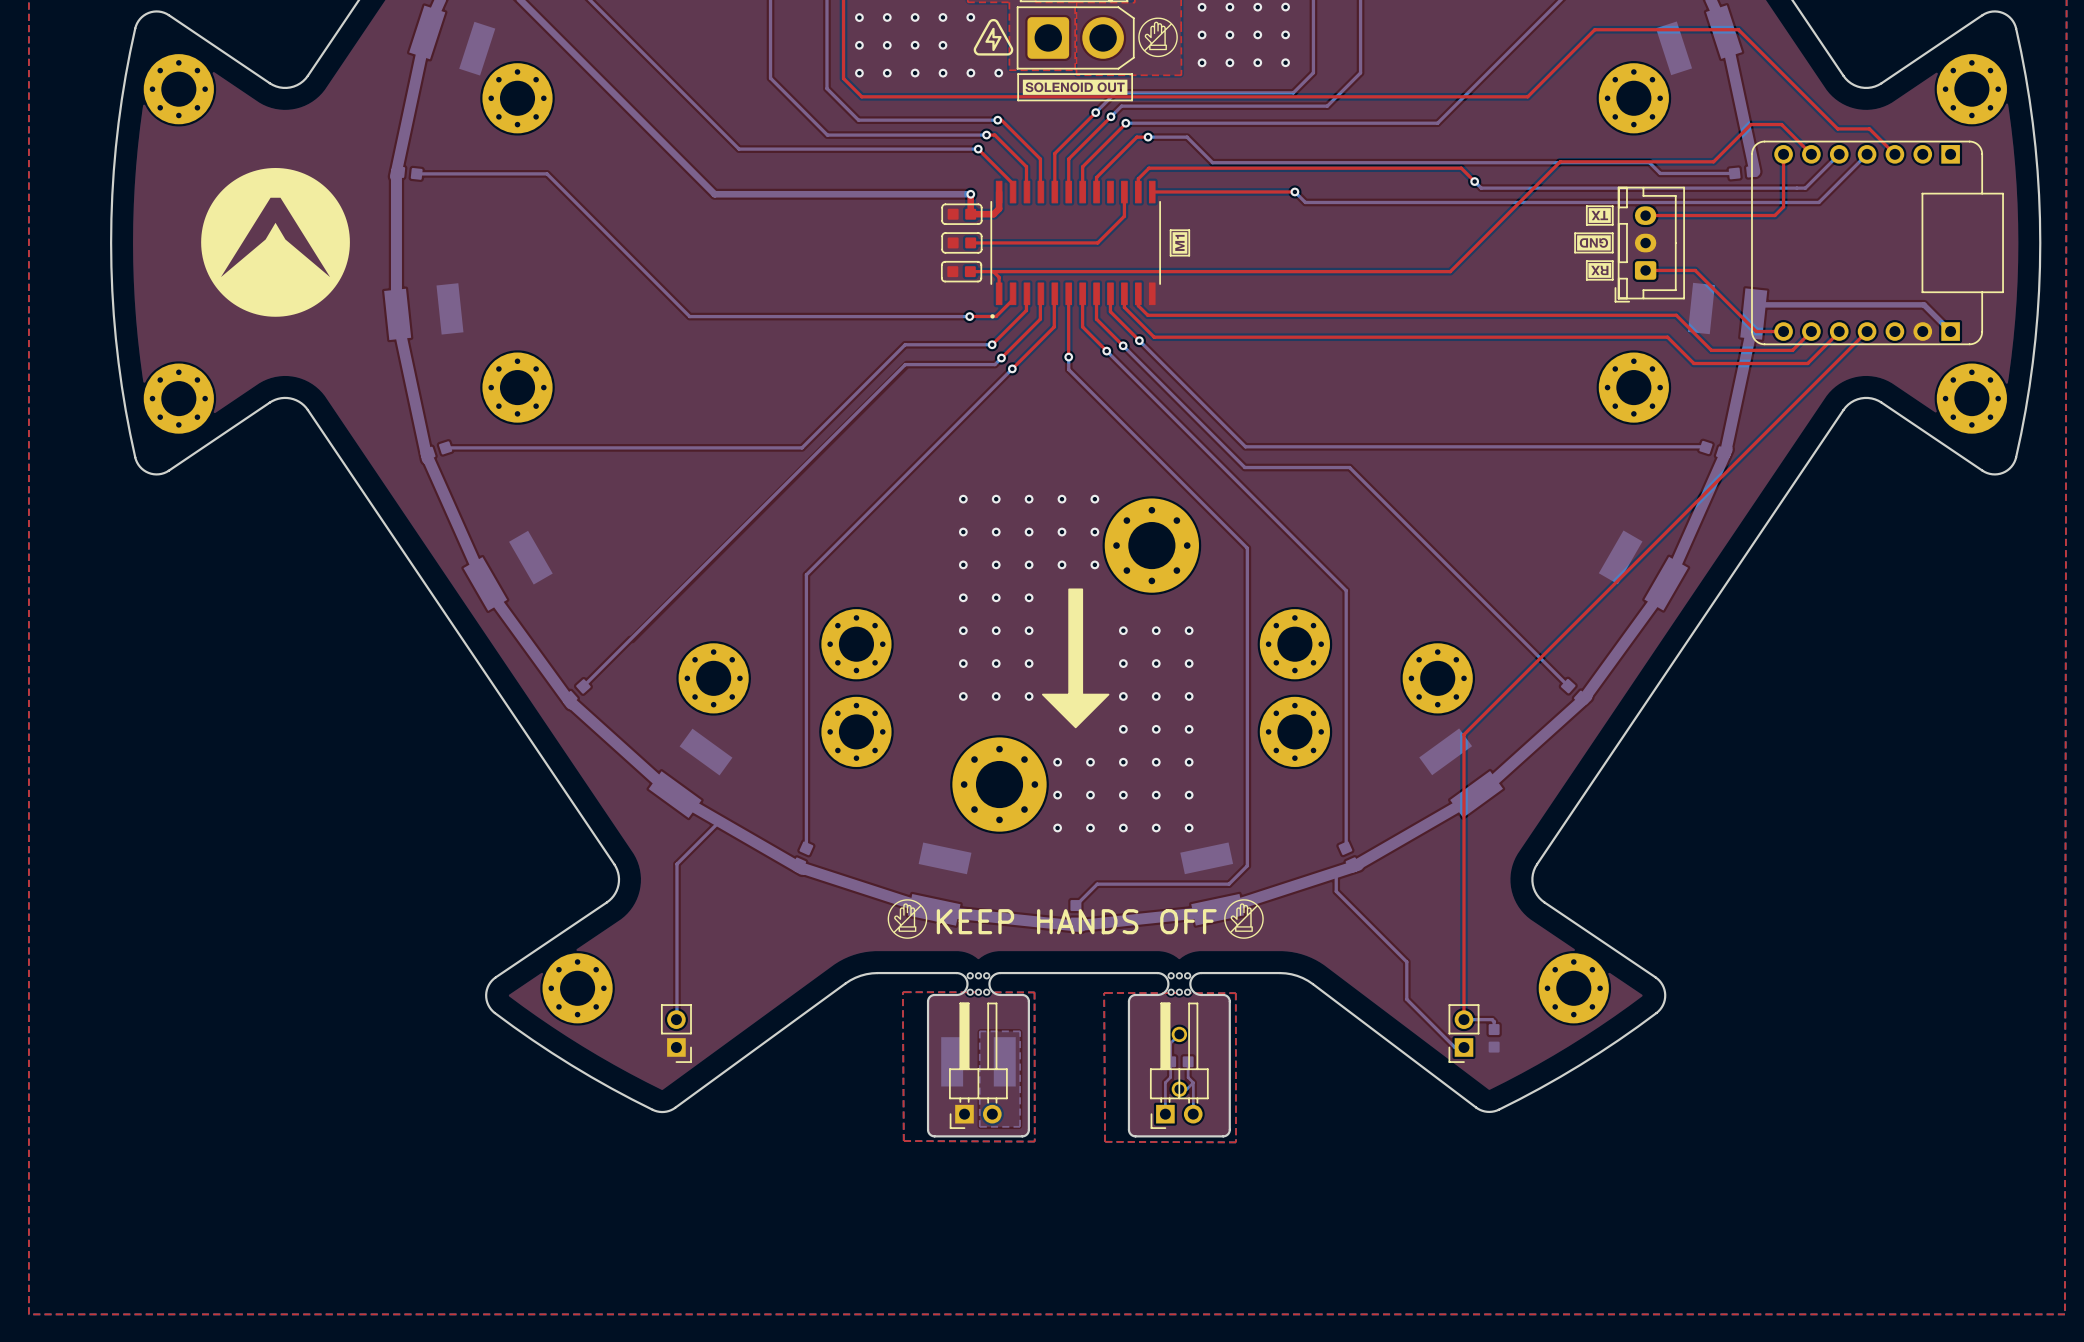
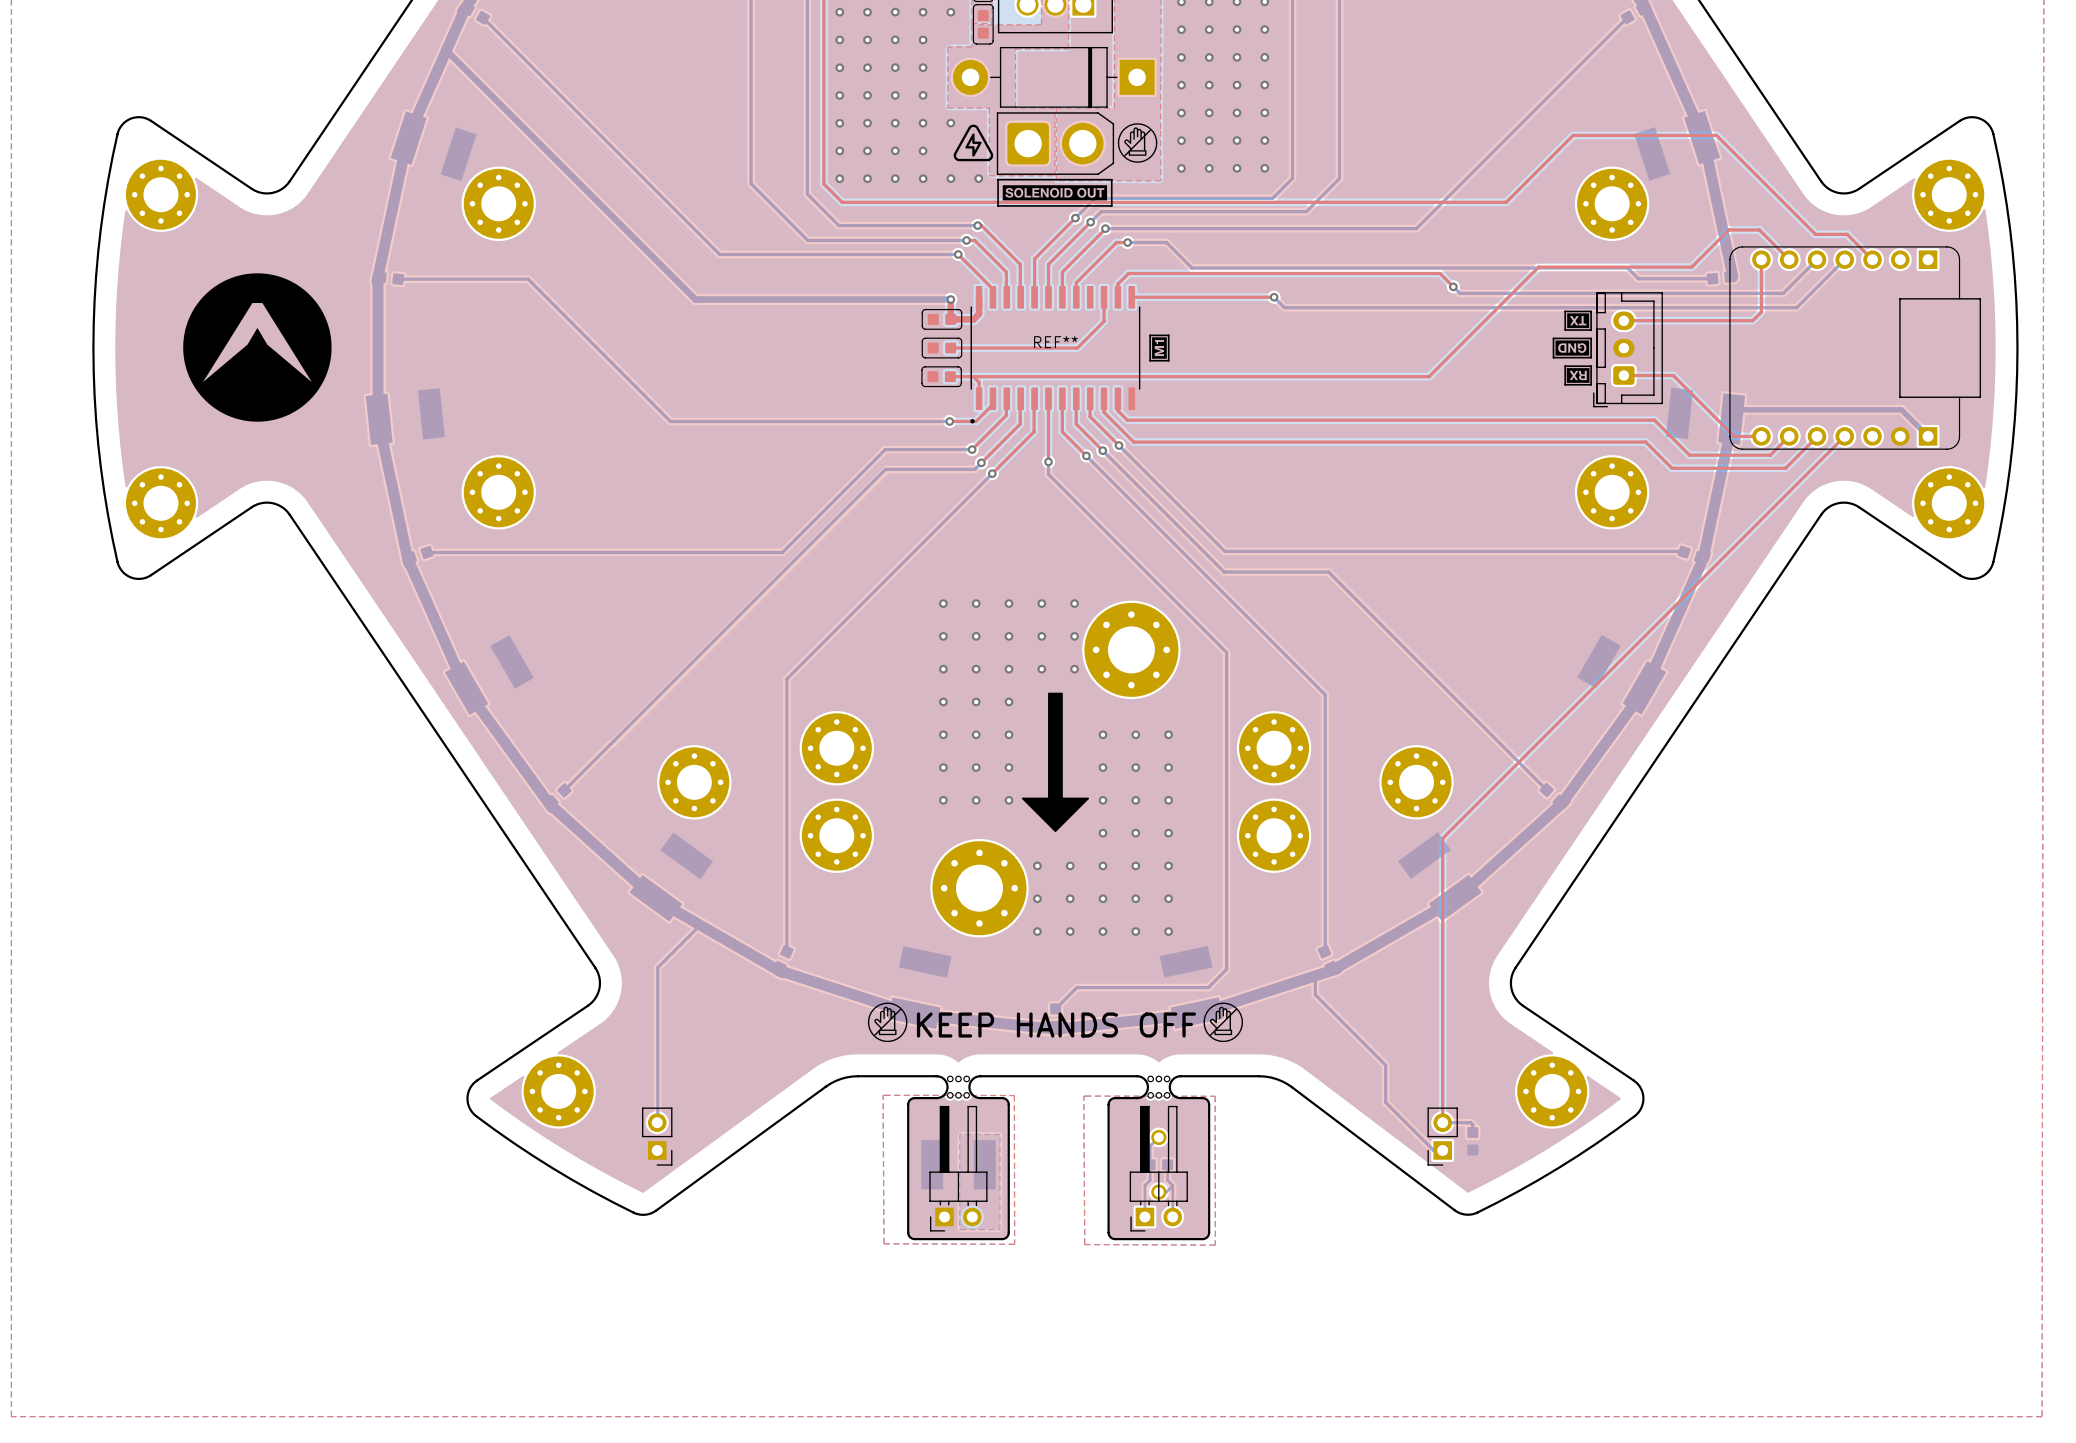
REF**: none -> (1055, 342)

